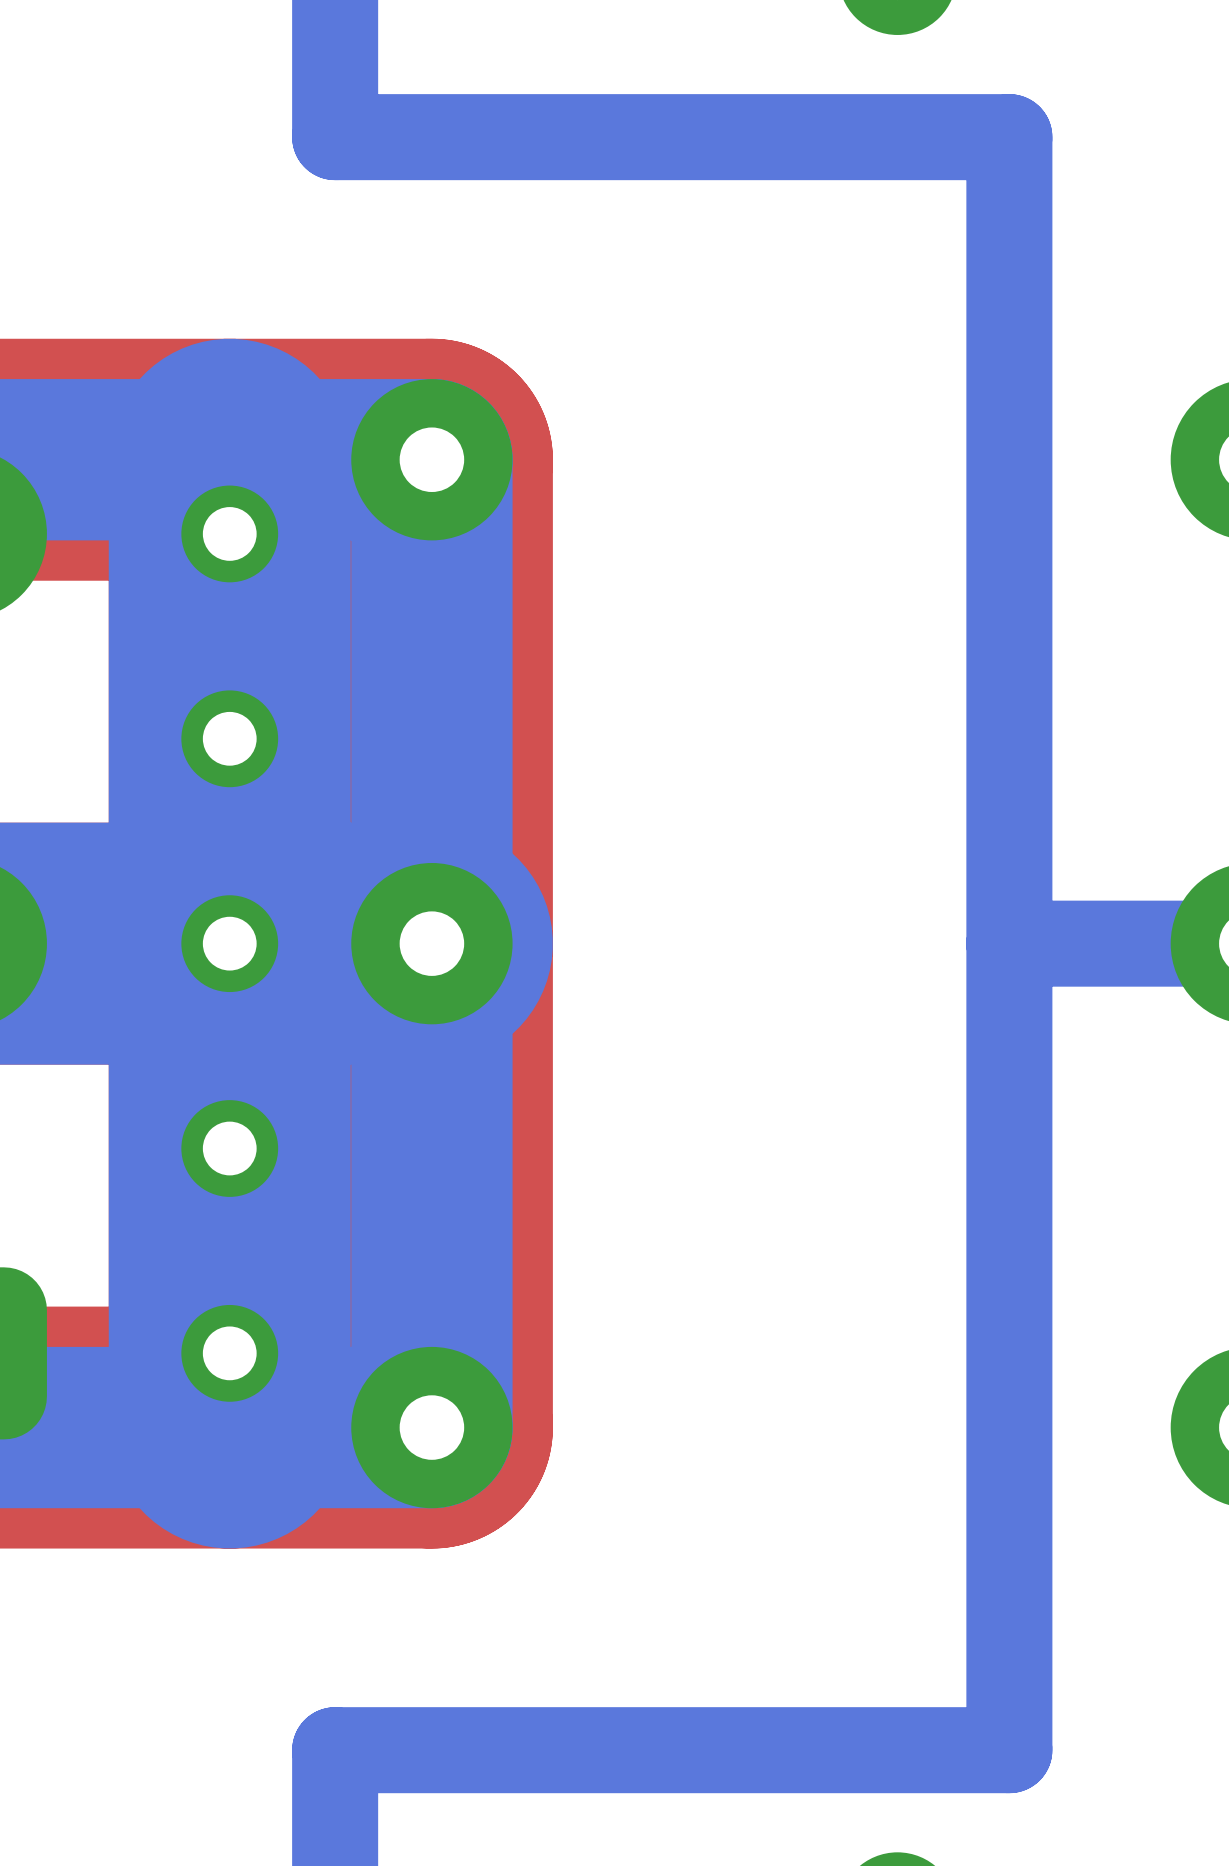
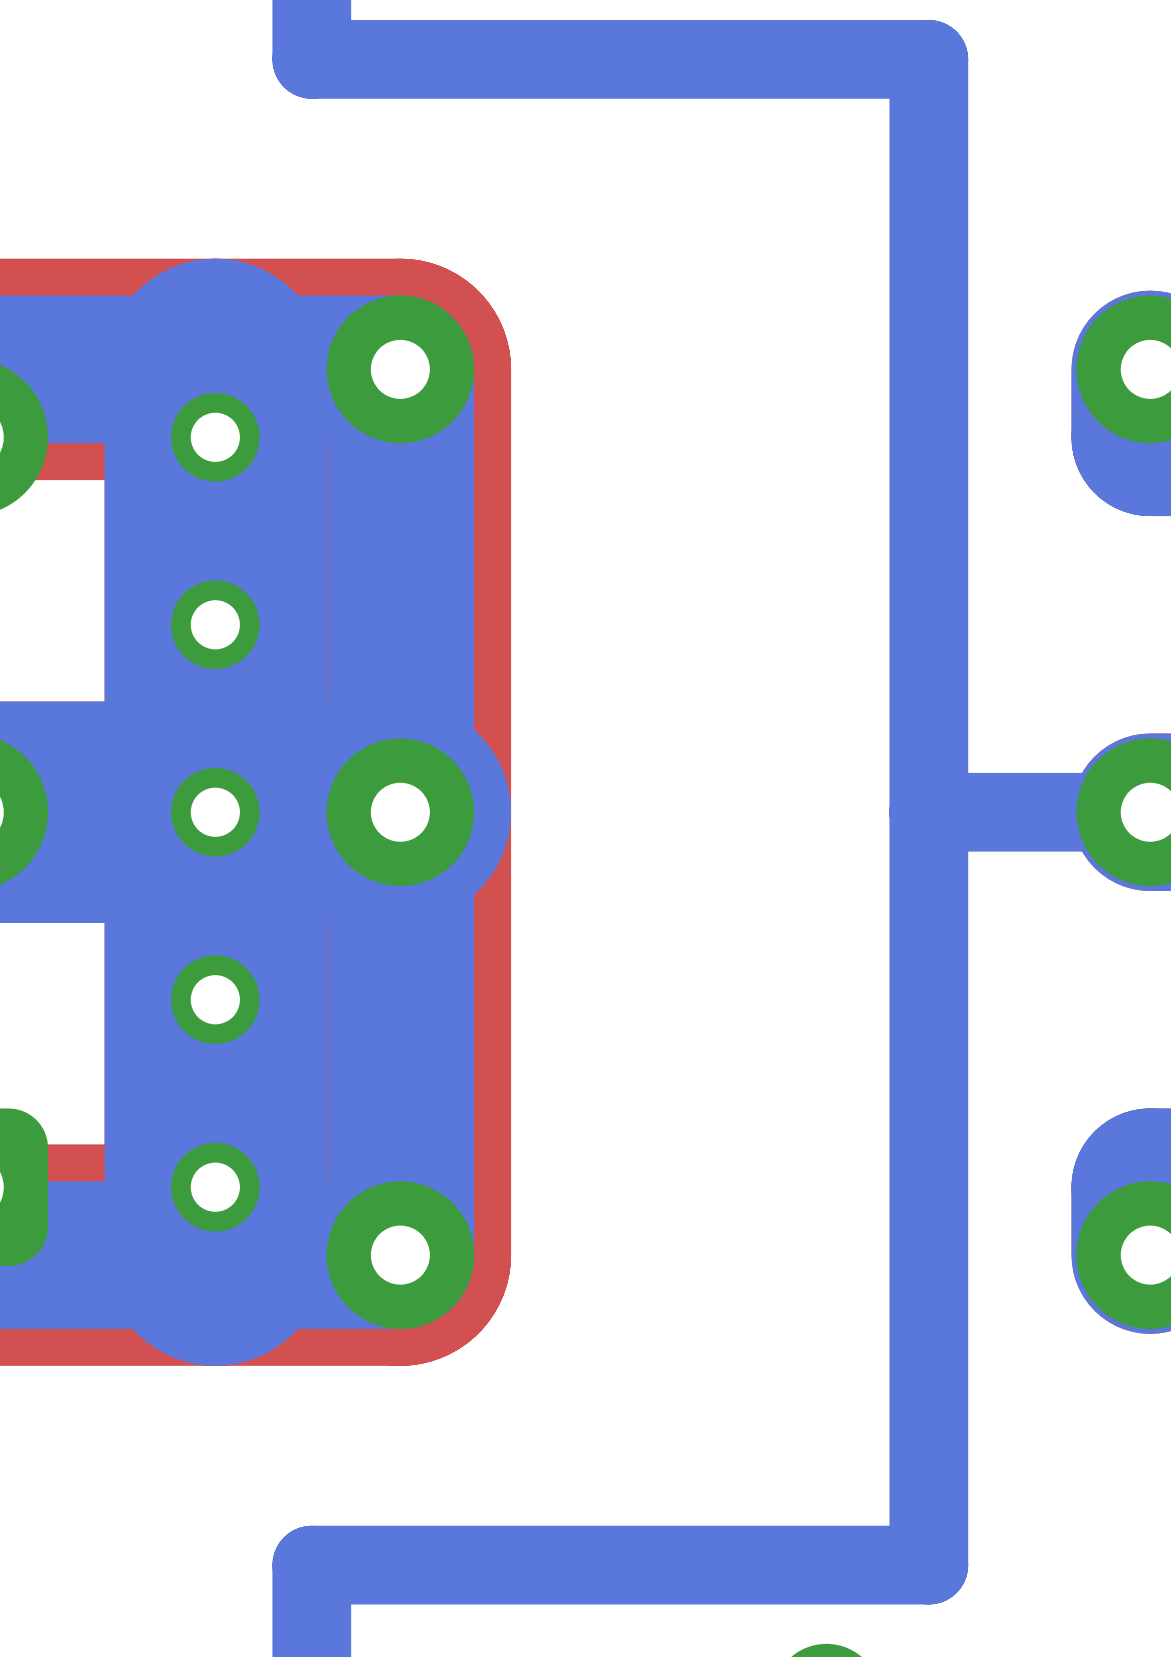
bottom track: (335, 121) (335, 137) (1009, 137) -> (311, 59) (928, 59) (928, 74)
bottom track: (1009, 1750) (335, 1750) (335, 1766) -> (928, 1550) (928, 1565) (311, 1565)

